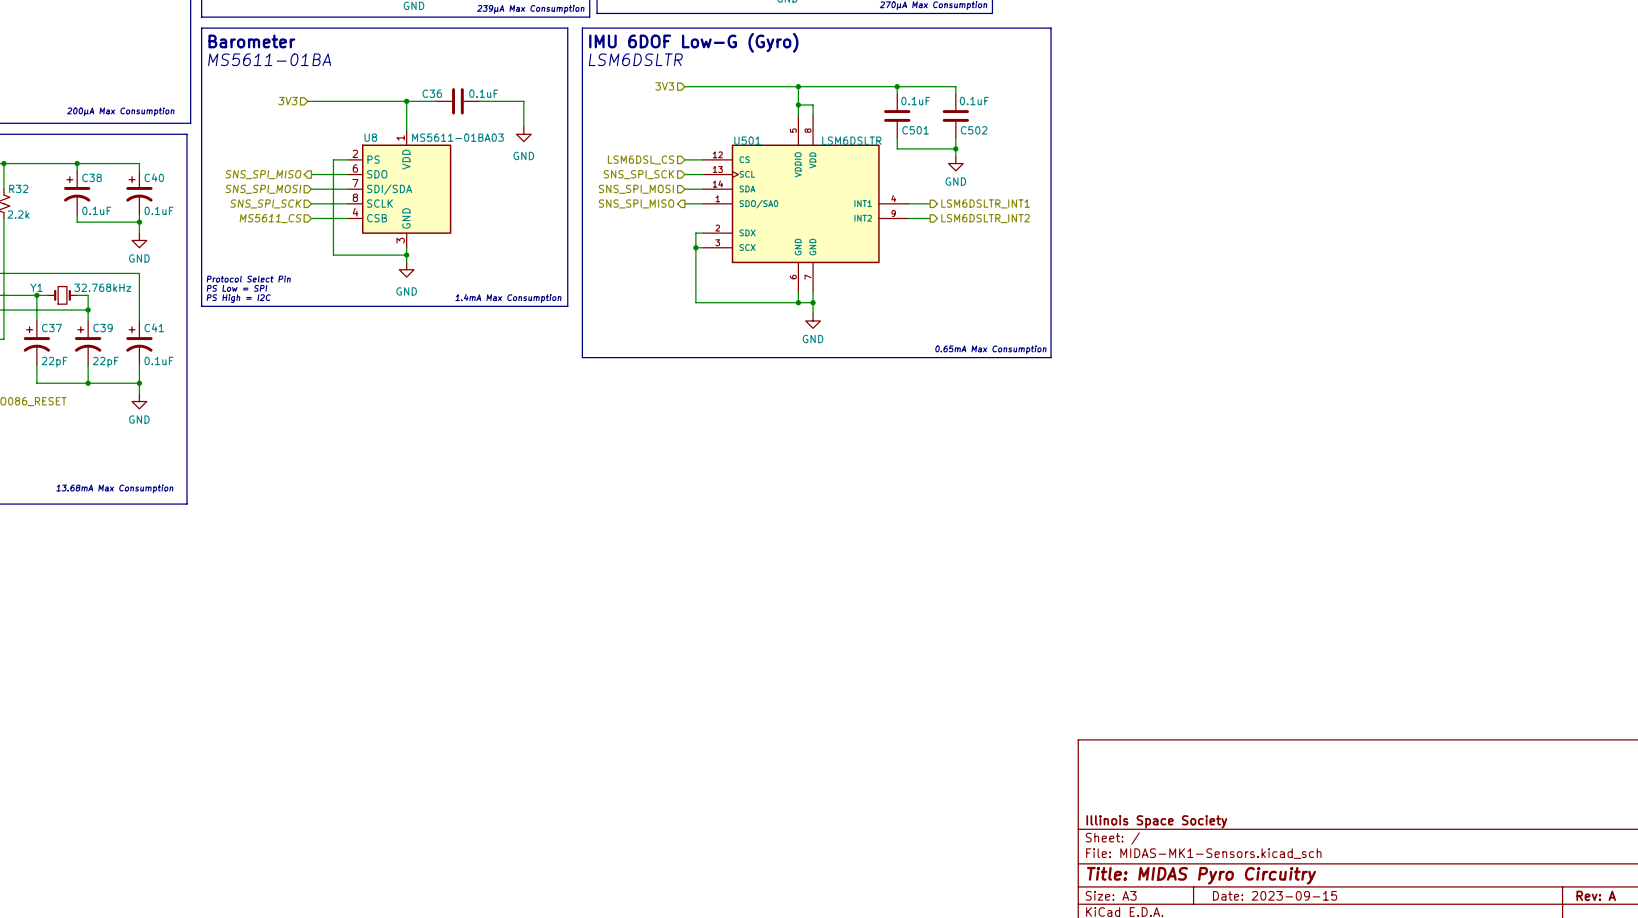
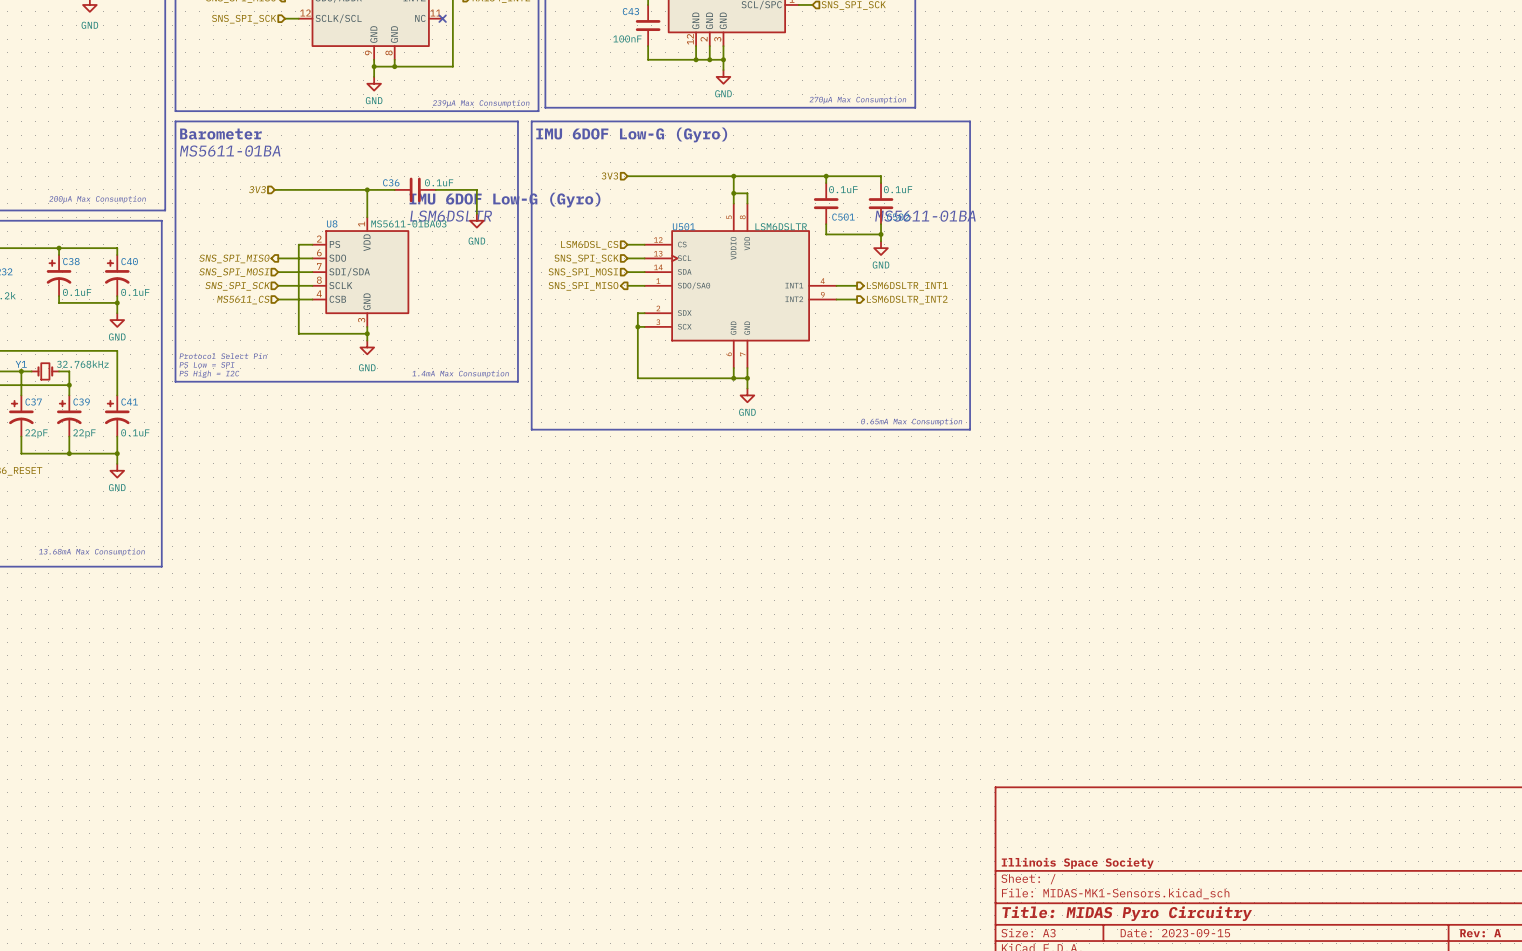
text: LSM6DSLTR (635, 59) -> none
text: none -> IMU 6DOF Low-G (Gyro) (504, 200)
text: none -> LSM6DSLTR (451, 216)
text: none -> MS5611-01BA (925, 216)

